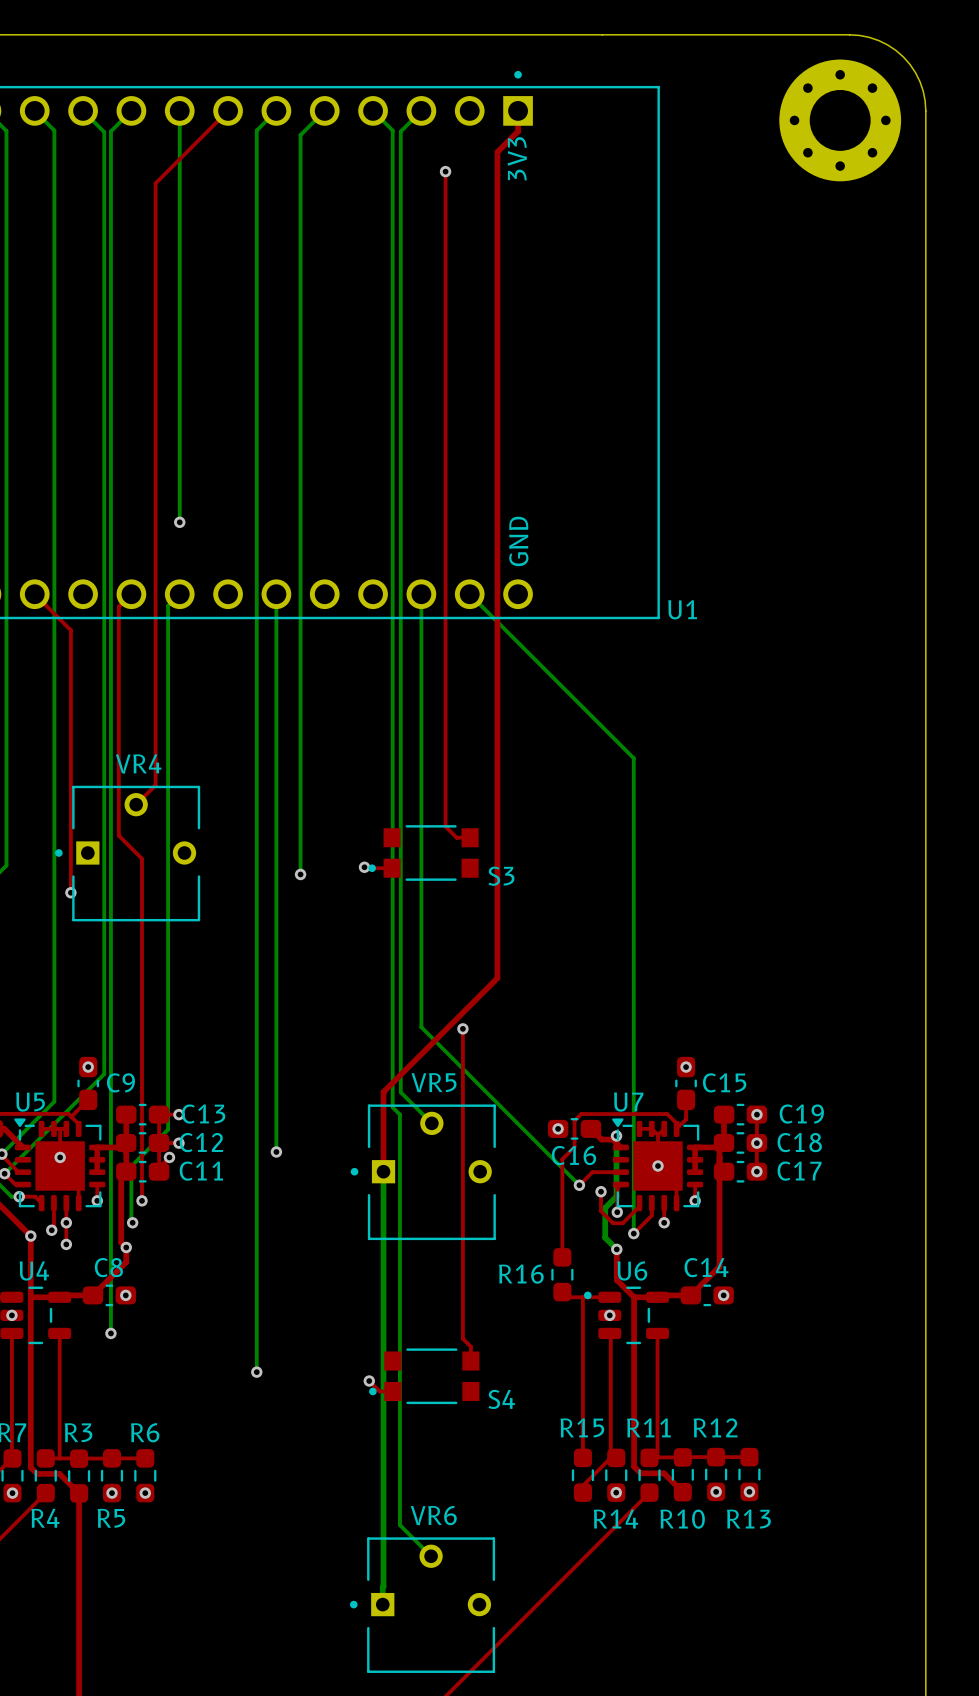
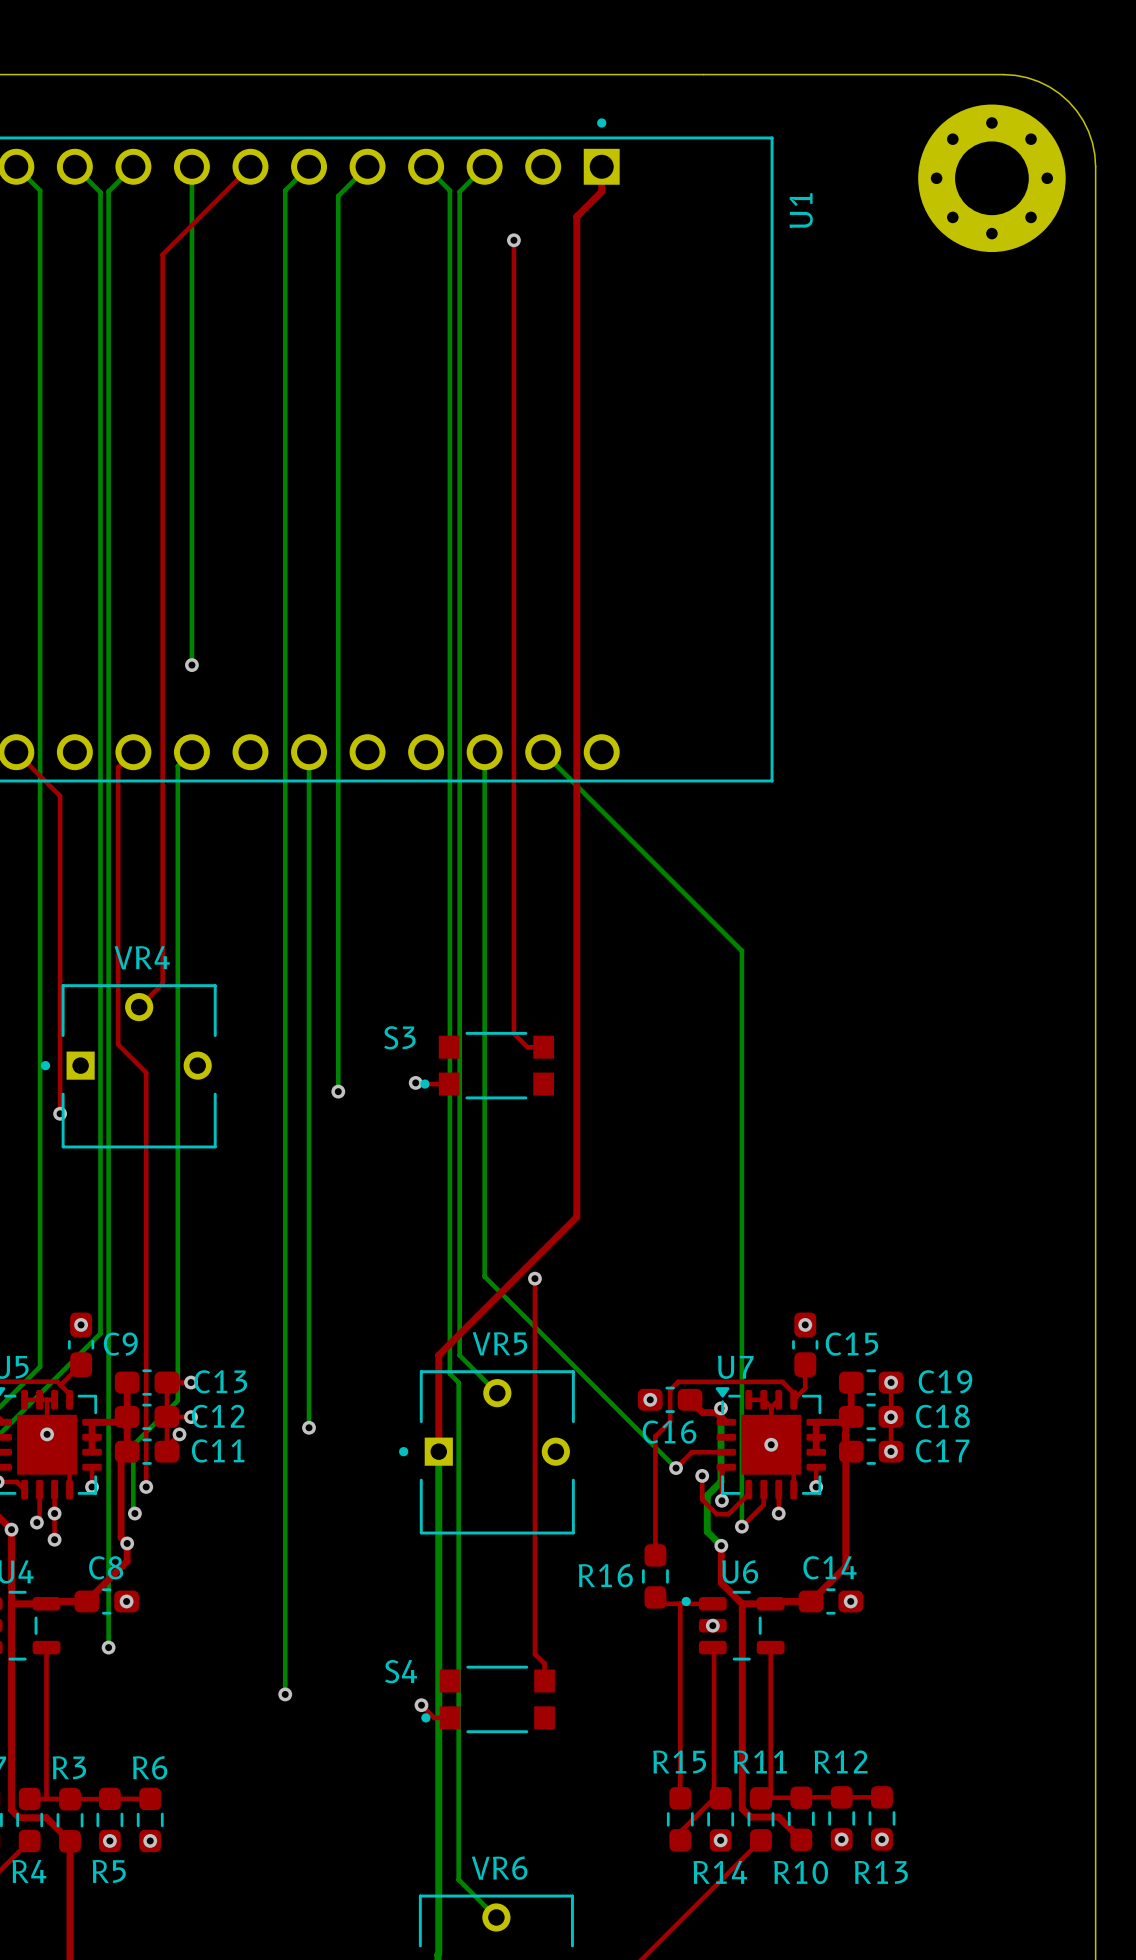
text: 3V3 (517, 158) -> none
text: GND (518, 541) -> none
U1 name rotation: 0° (682, 609) -> 90° counterclockwise (801, 210)
U1 name position: U1 (682, 609) -> U1 (801, 210)
S3 name position: S3 (501, 876) -> S3 (399, 1037)
S4 name position: S4 (501, 1399) -> S4 (401, 1671)

